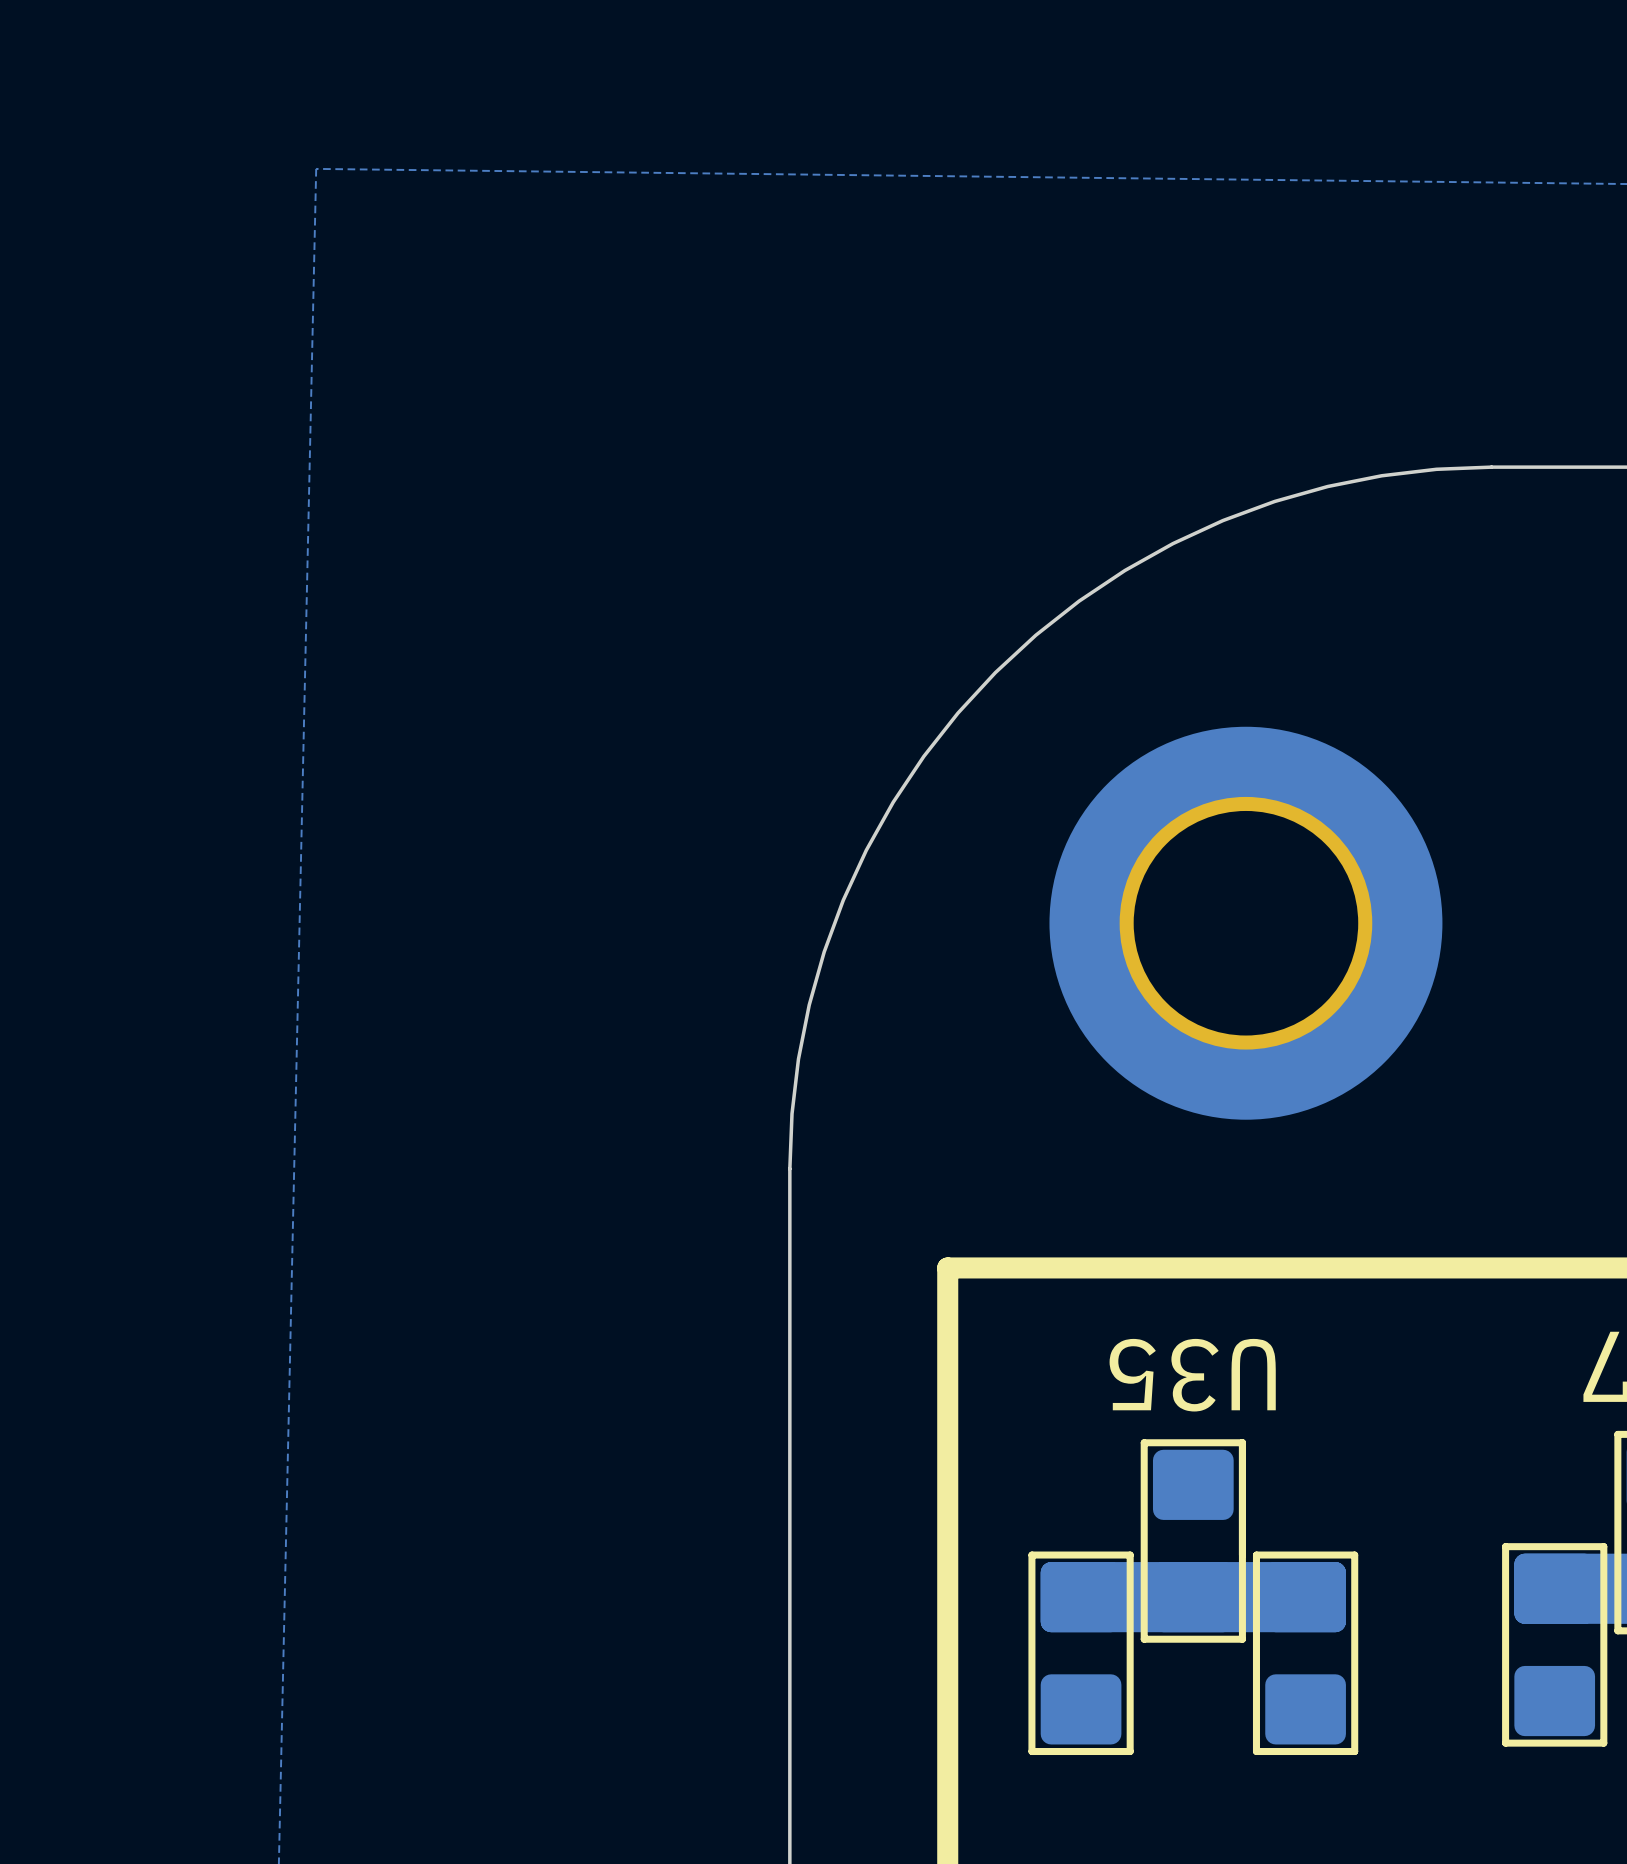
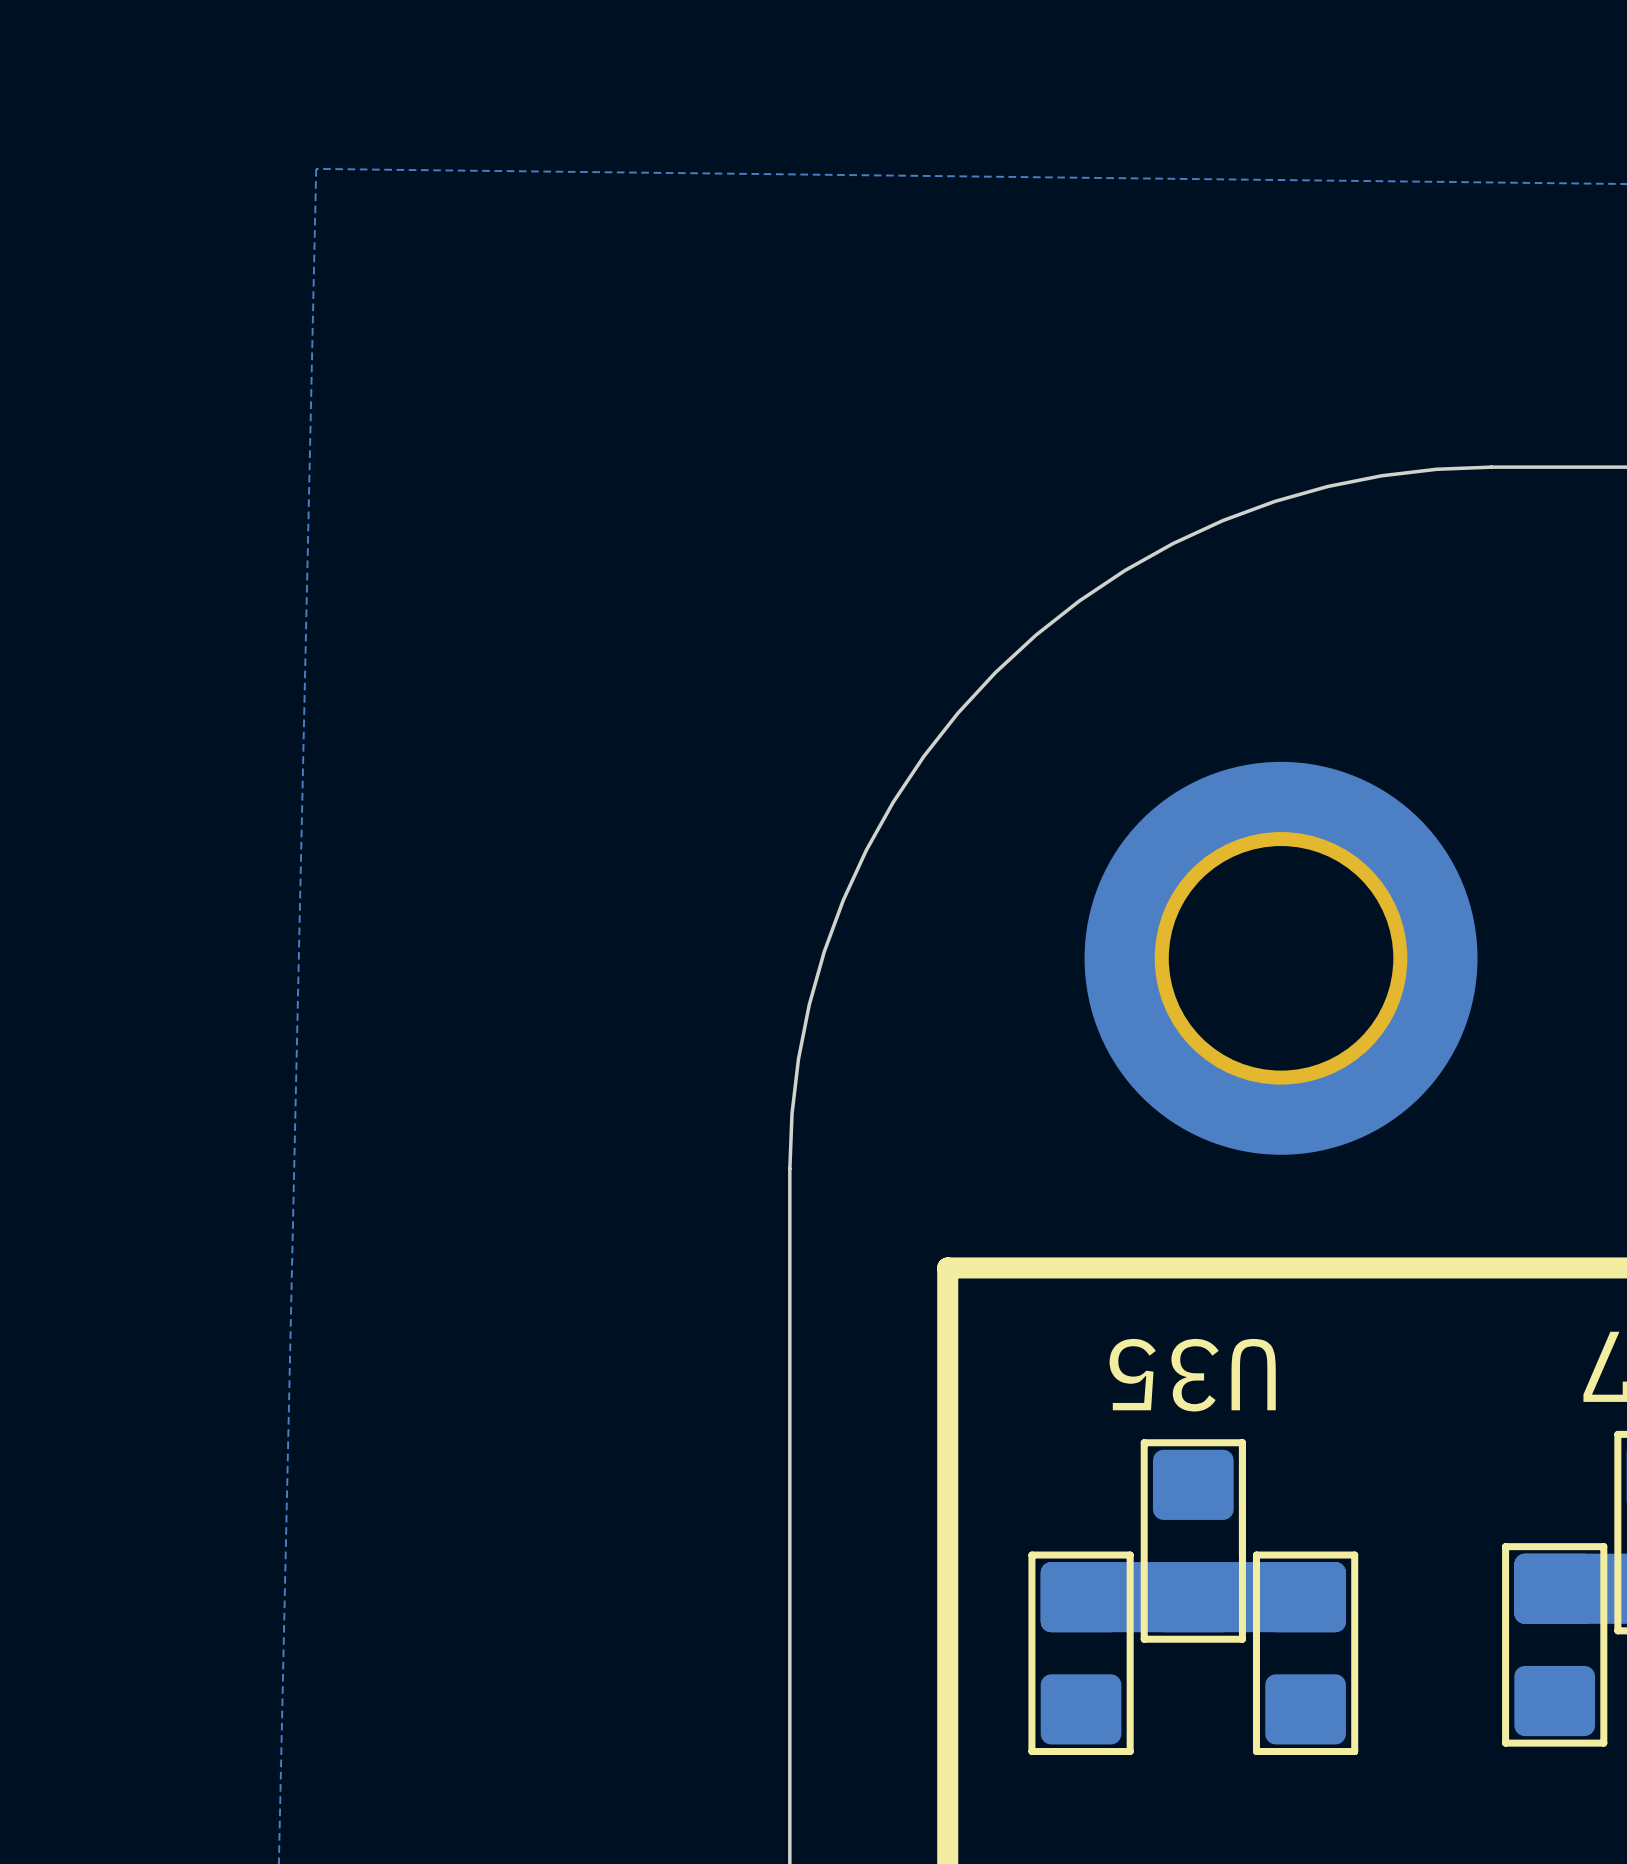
part position: (1245, 923) -> (1281, 958)

